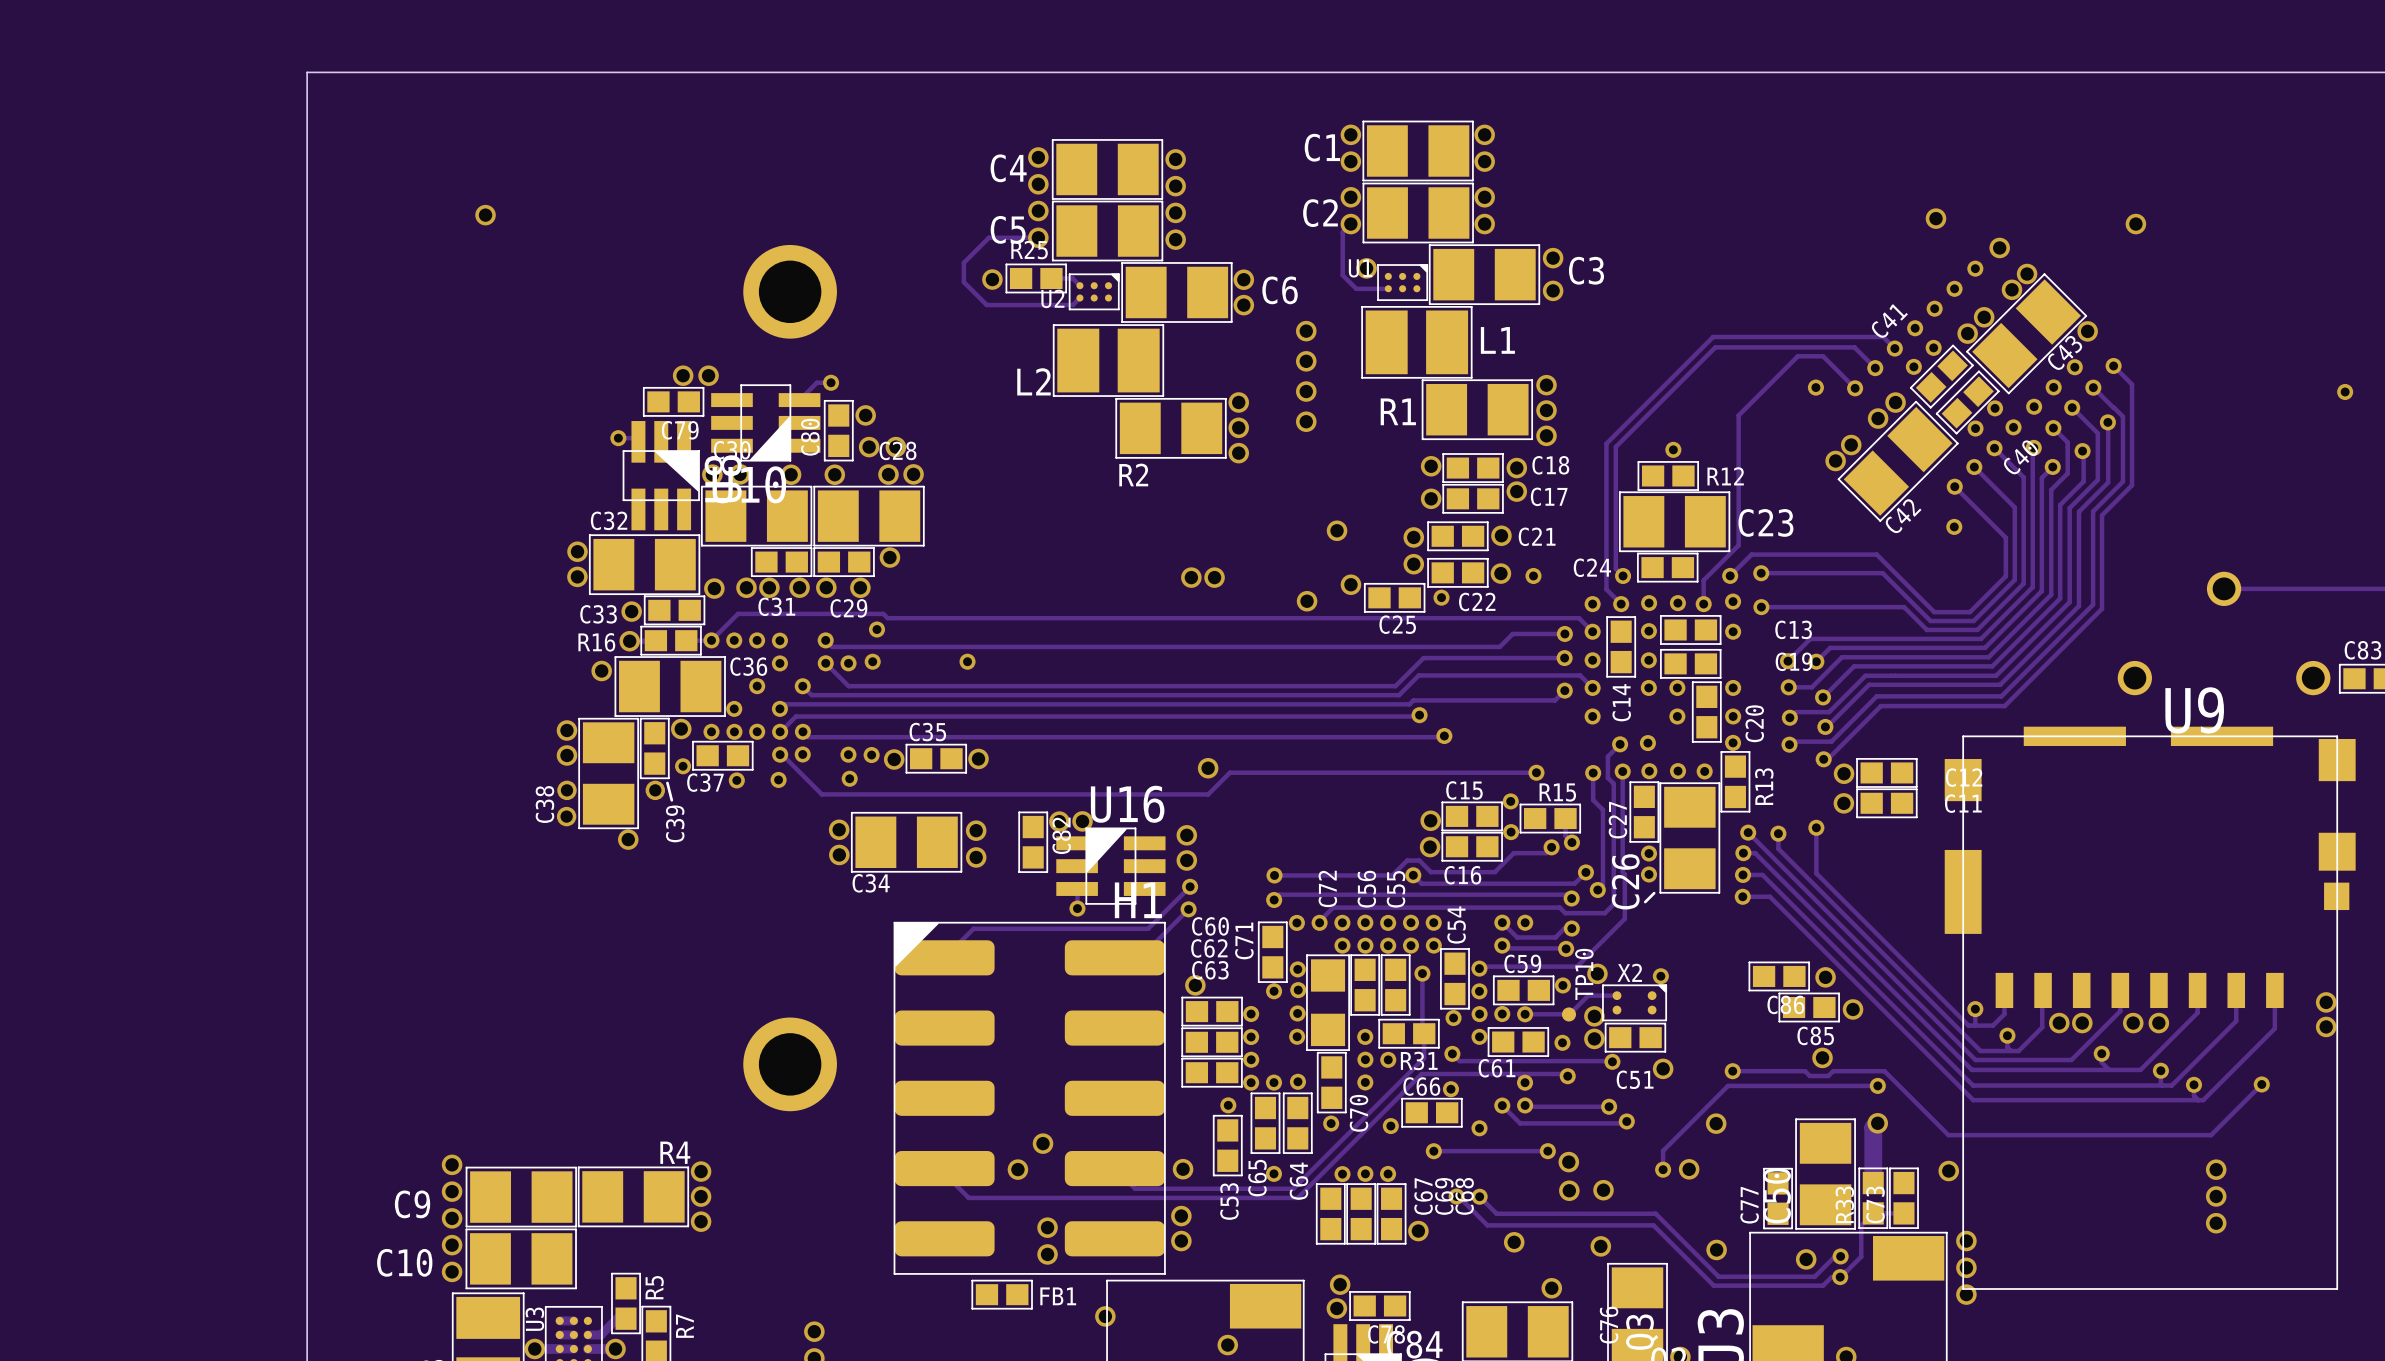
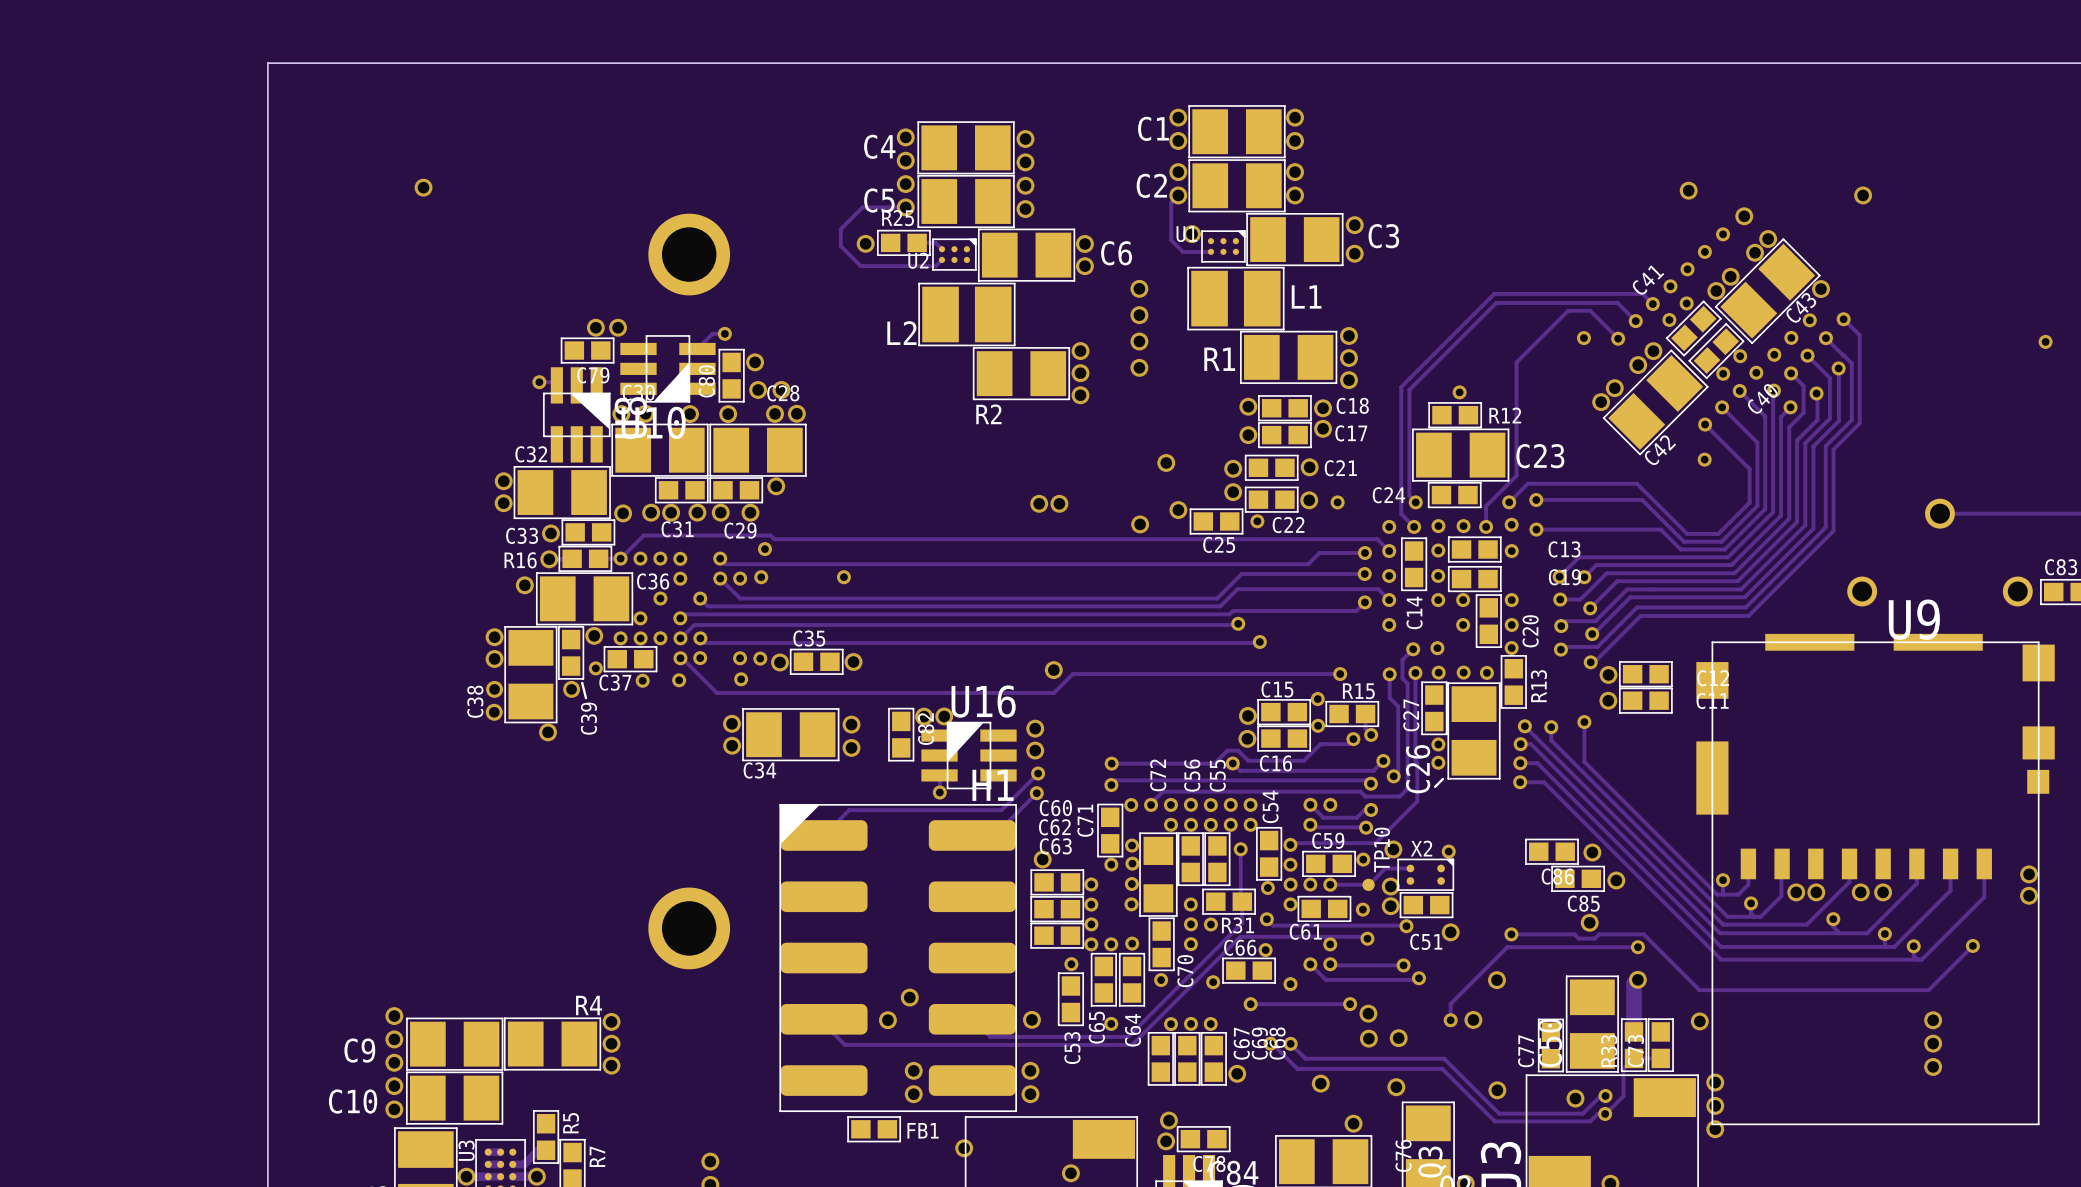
via: (1181, 1216) -> none
via: none -> (1030, 1070)
via: (1181, 1241) -> none
via: none -> (1030, 1094)

